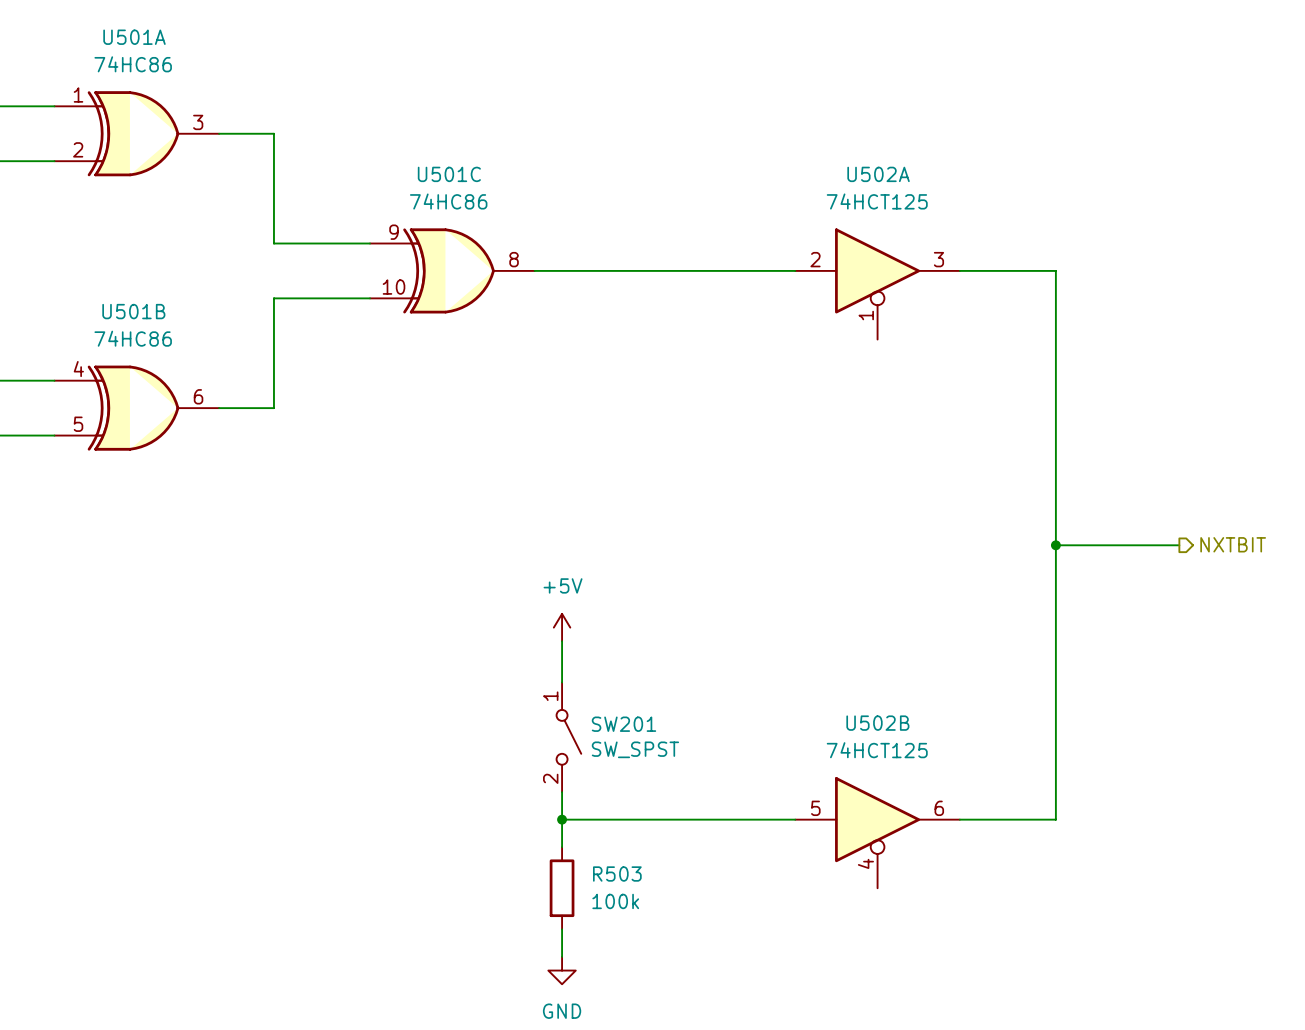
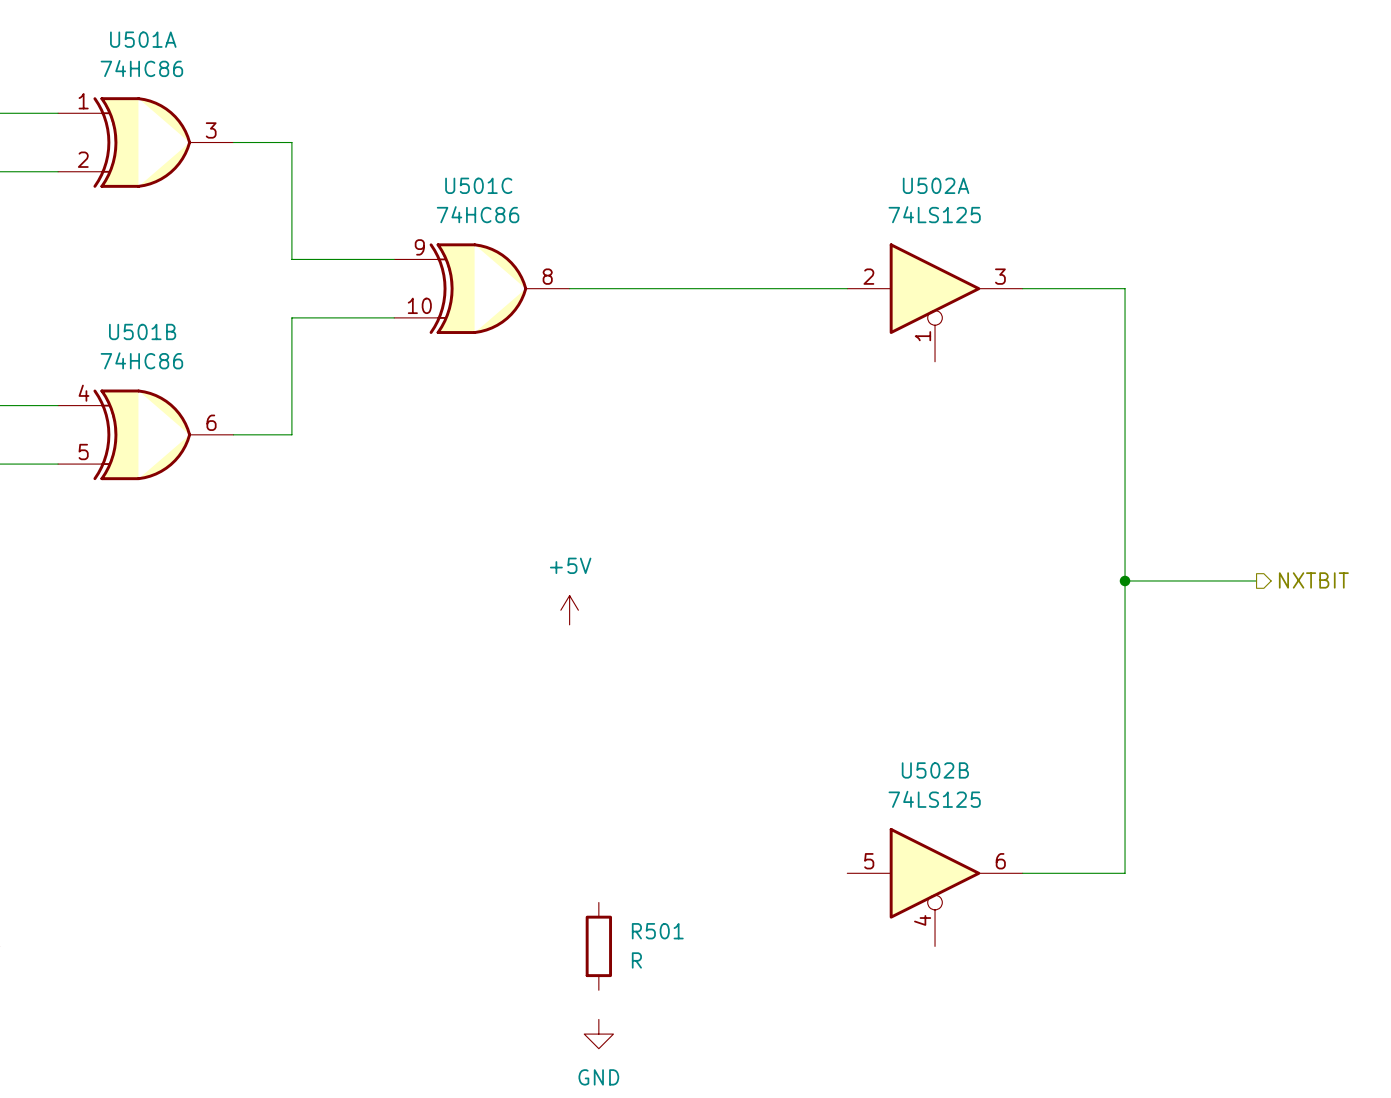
U502A value: 74HCT125 (877, 201) -> 74LS125 (934, 214)
power symbol position: +5V (562, 627) -> +5V (569, 610)
wire: (562, 641) (562, 682) -> none
SW201: SW_SPST (568, 737) -> none
U502B value: 74HCT125 (877, 750) -> 74LS125 (934, 799)
wire: (562, 792) (562, 847) -> none
wire: (562, 819) (795, 819) -> none
junction: (562, 819) -> none
R503 name: R503 (617, 874) -> R501 (657, 931)
R503 value: 100k (615, 901) -> R (636, 960)
wire: (562, 929) (562, 956) -> none

